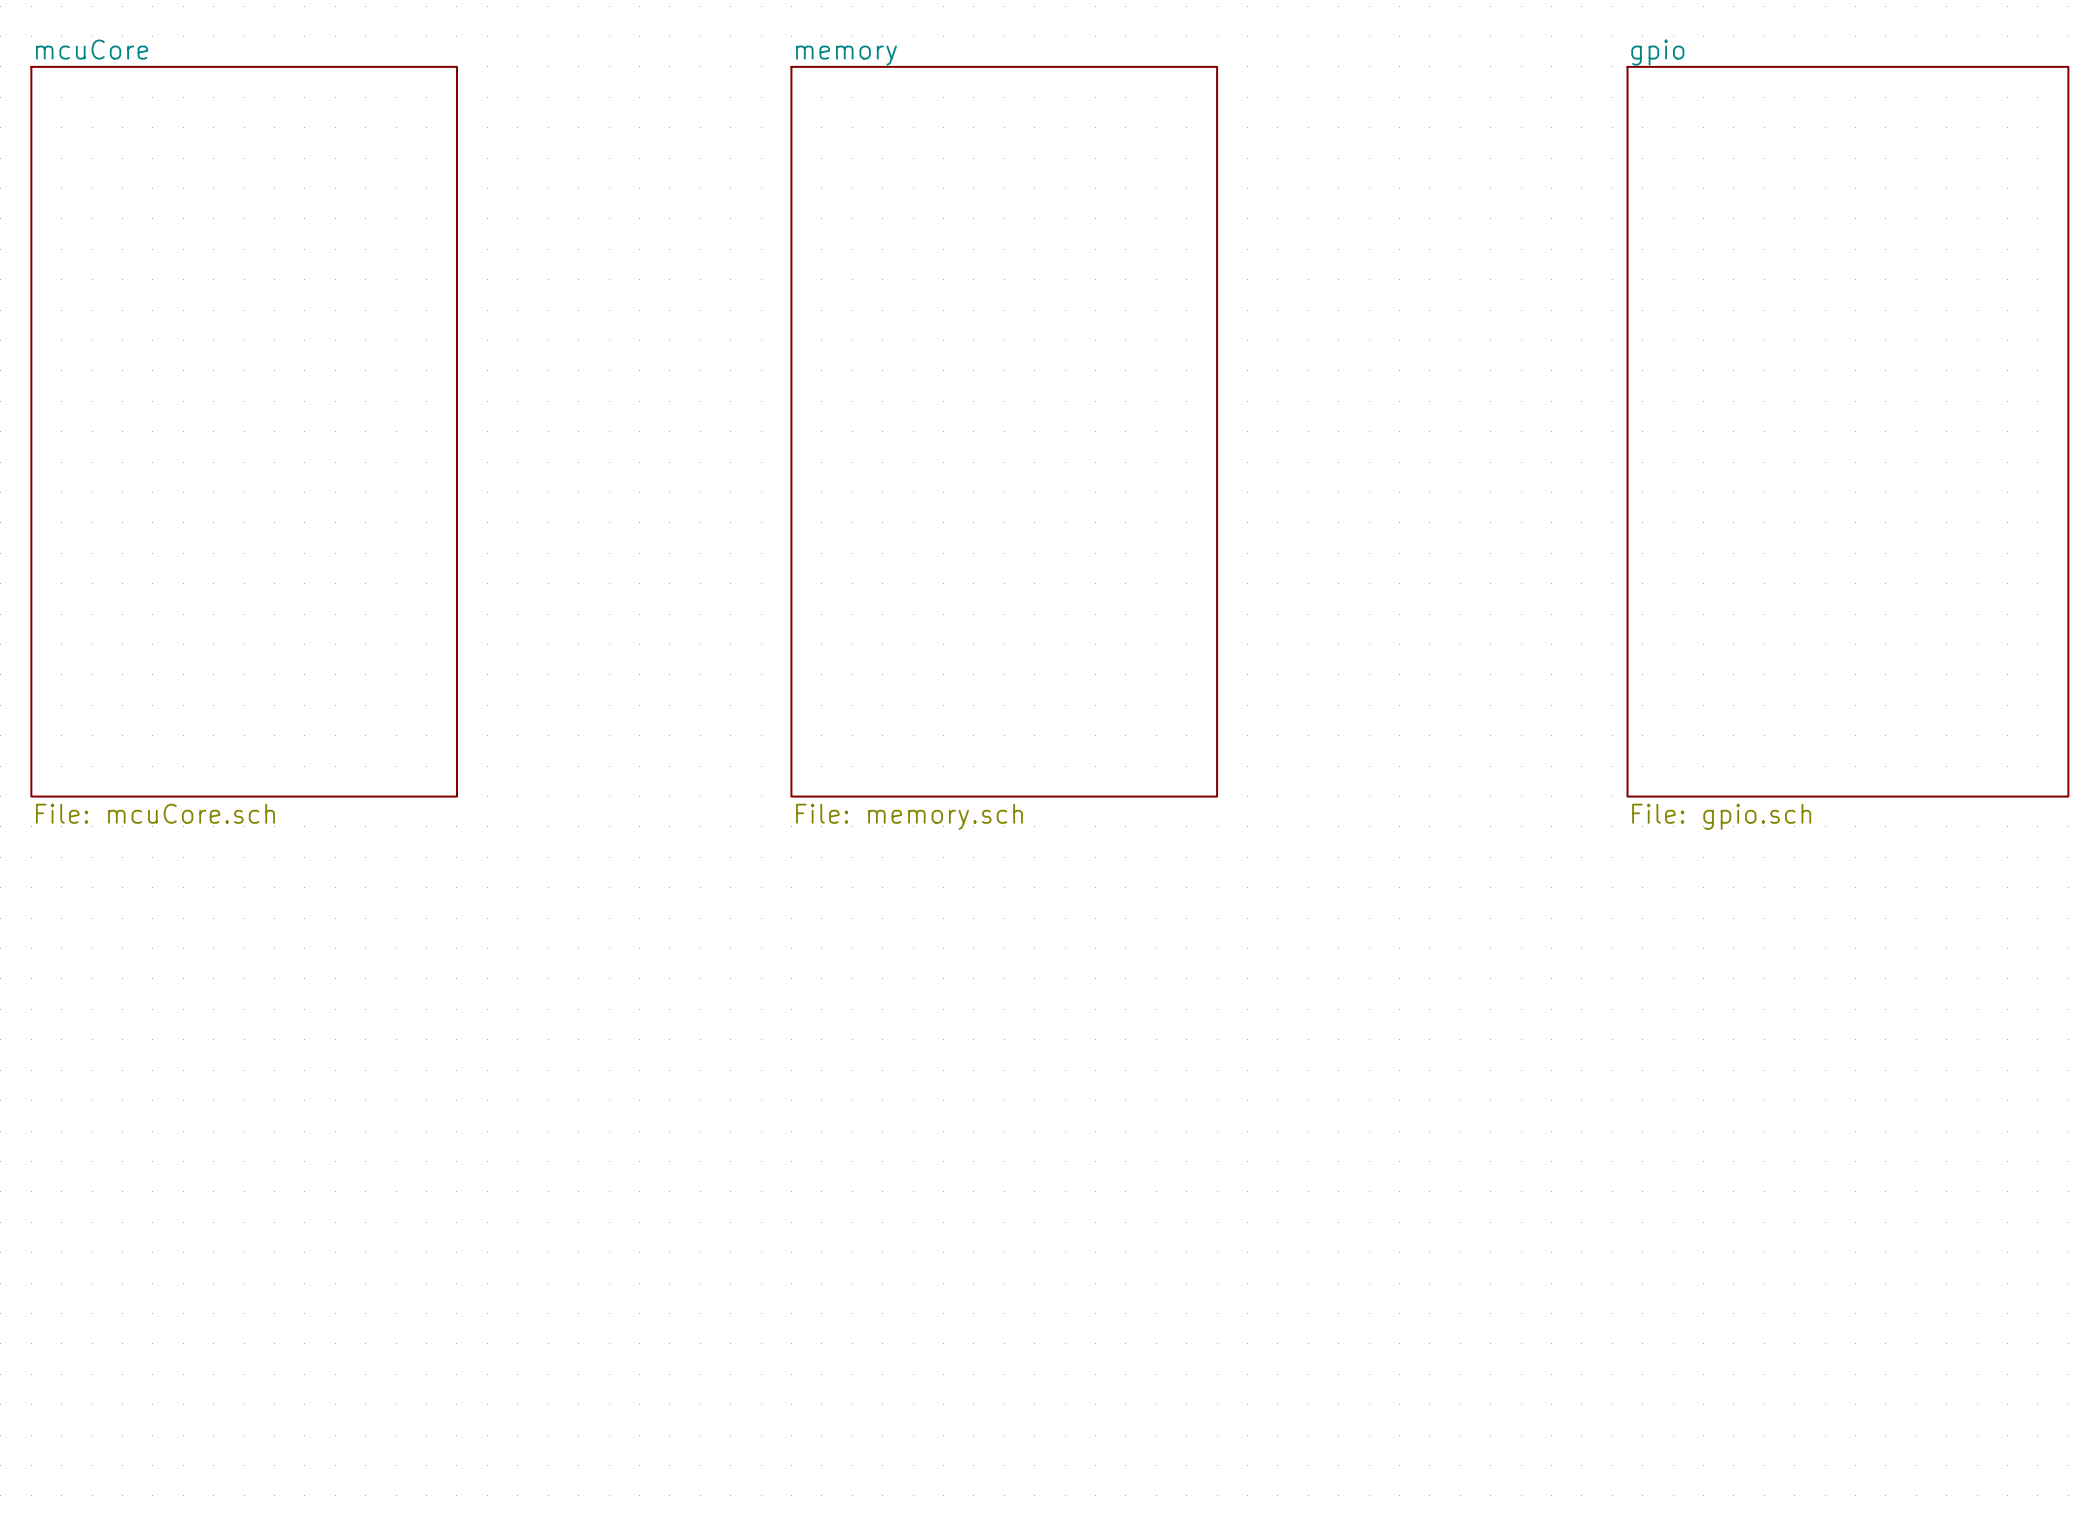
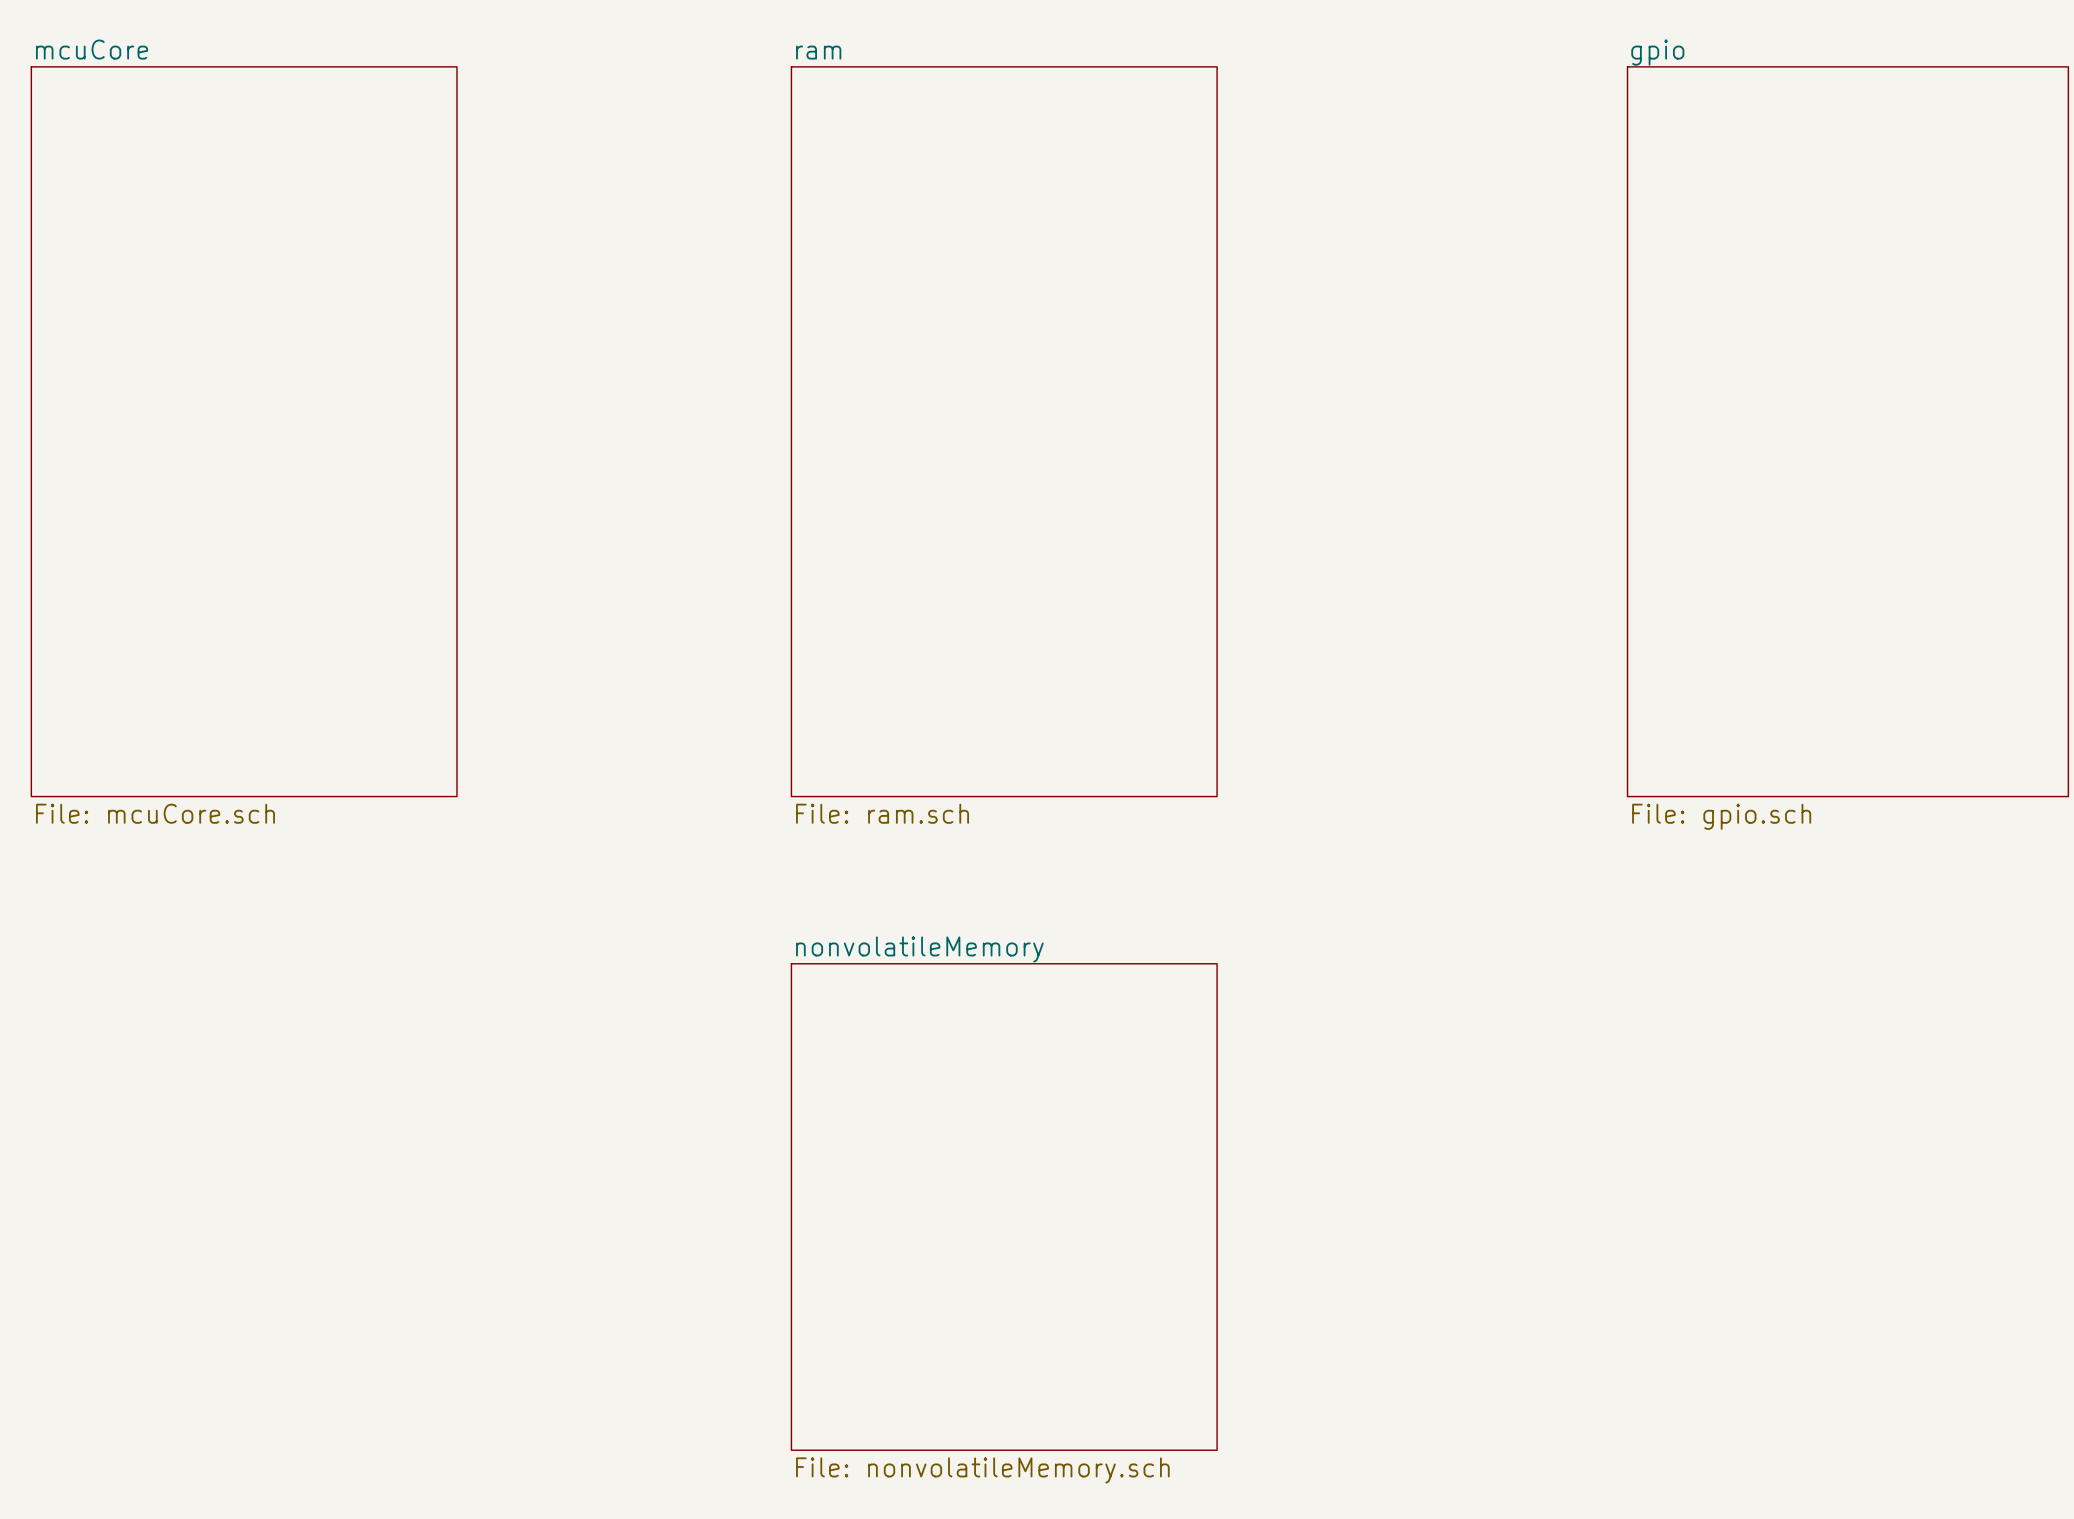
sheet memory name: memory (846, 55) -> ram (818, 52)
sheet memory value: File: memory.sch (909, 816) -> File: ram.sch (882, 813)
sheet nonvolatileMemory: none -> File: nonvolatileMemory.sch (1004, 1207)

